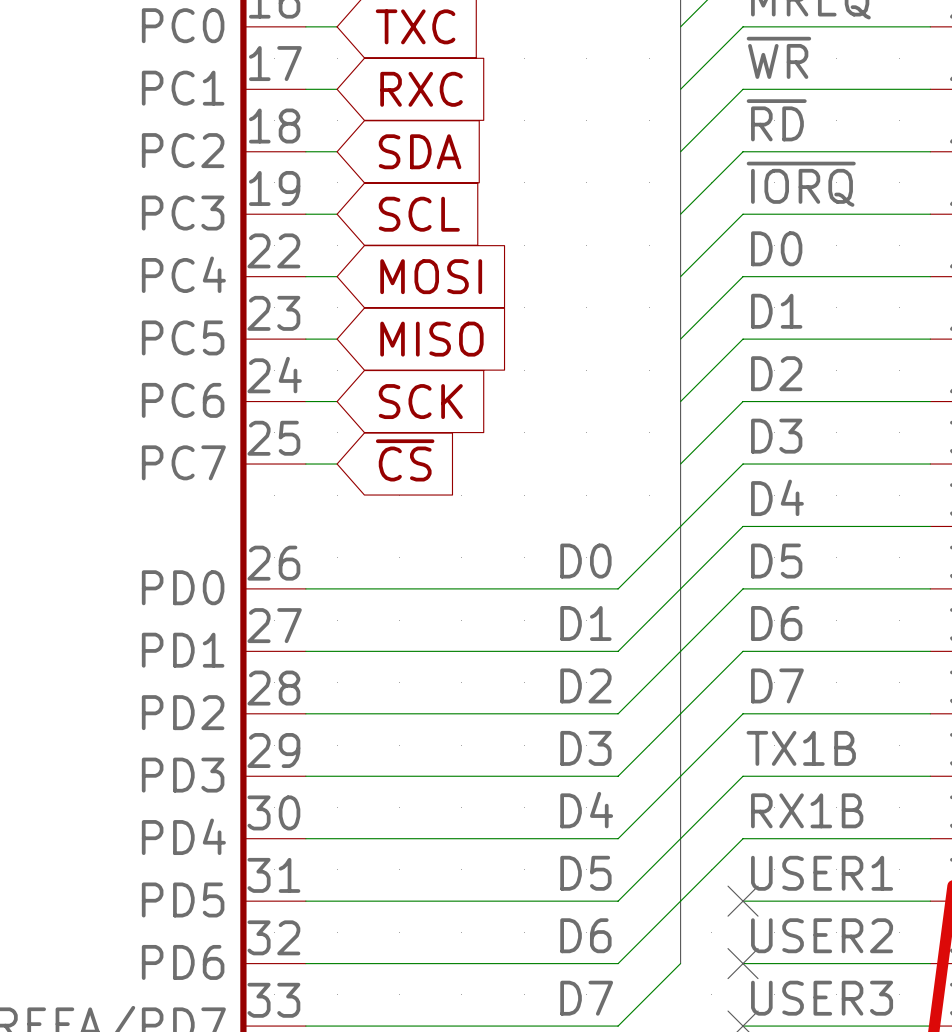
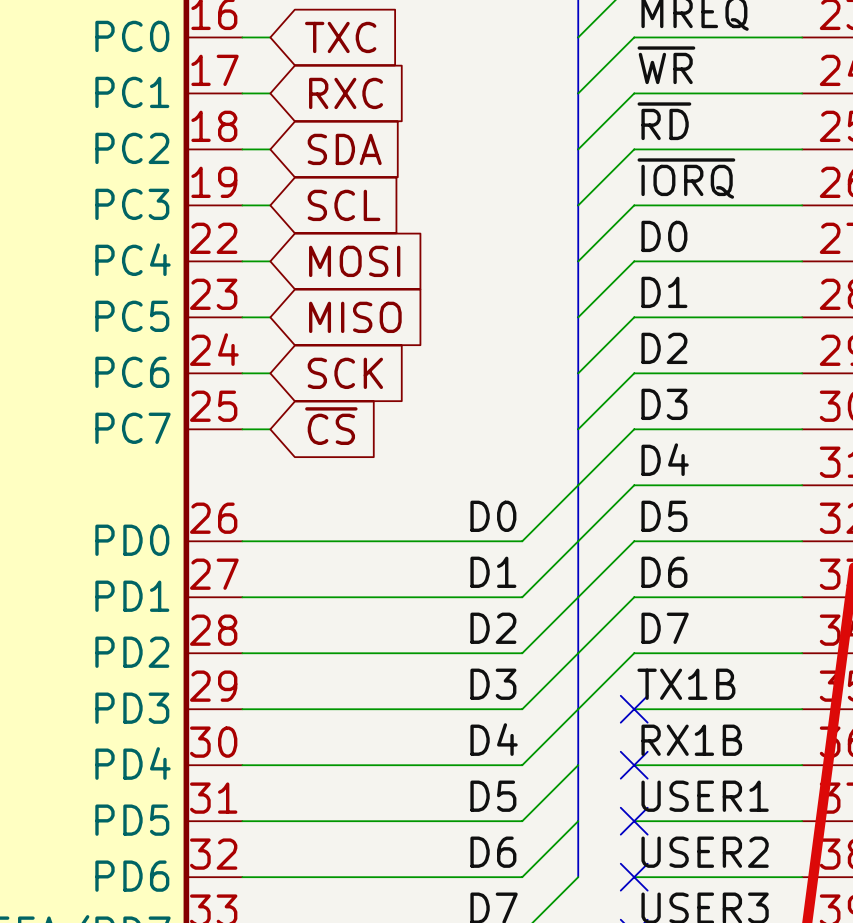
wire: (743, 776) (680, 838) -> none
no-connect mark: none -> (634, 709)
wire: (743, 838) (680, 901) -> none
no-connect mark: none -> (634, 765)

